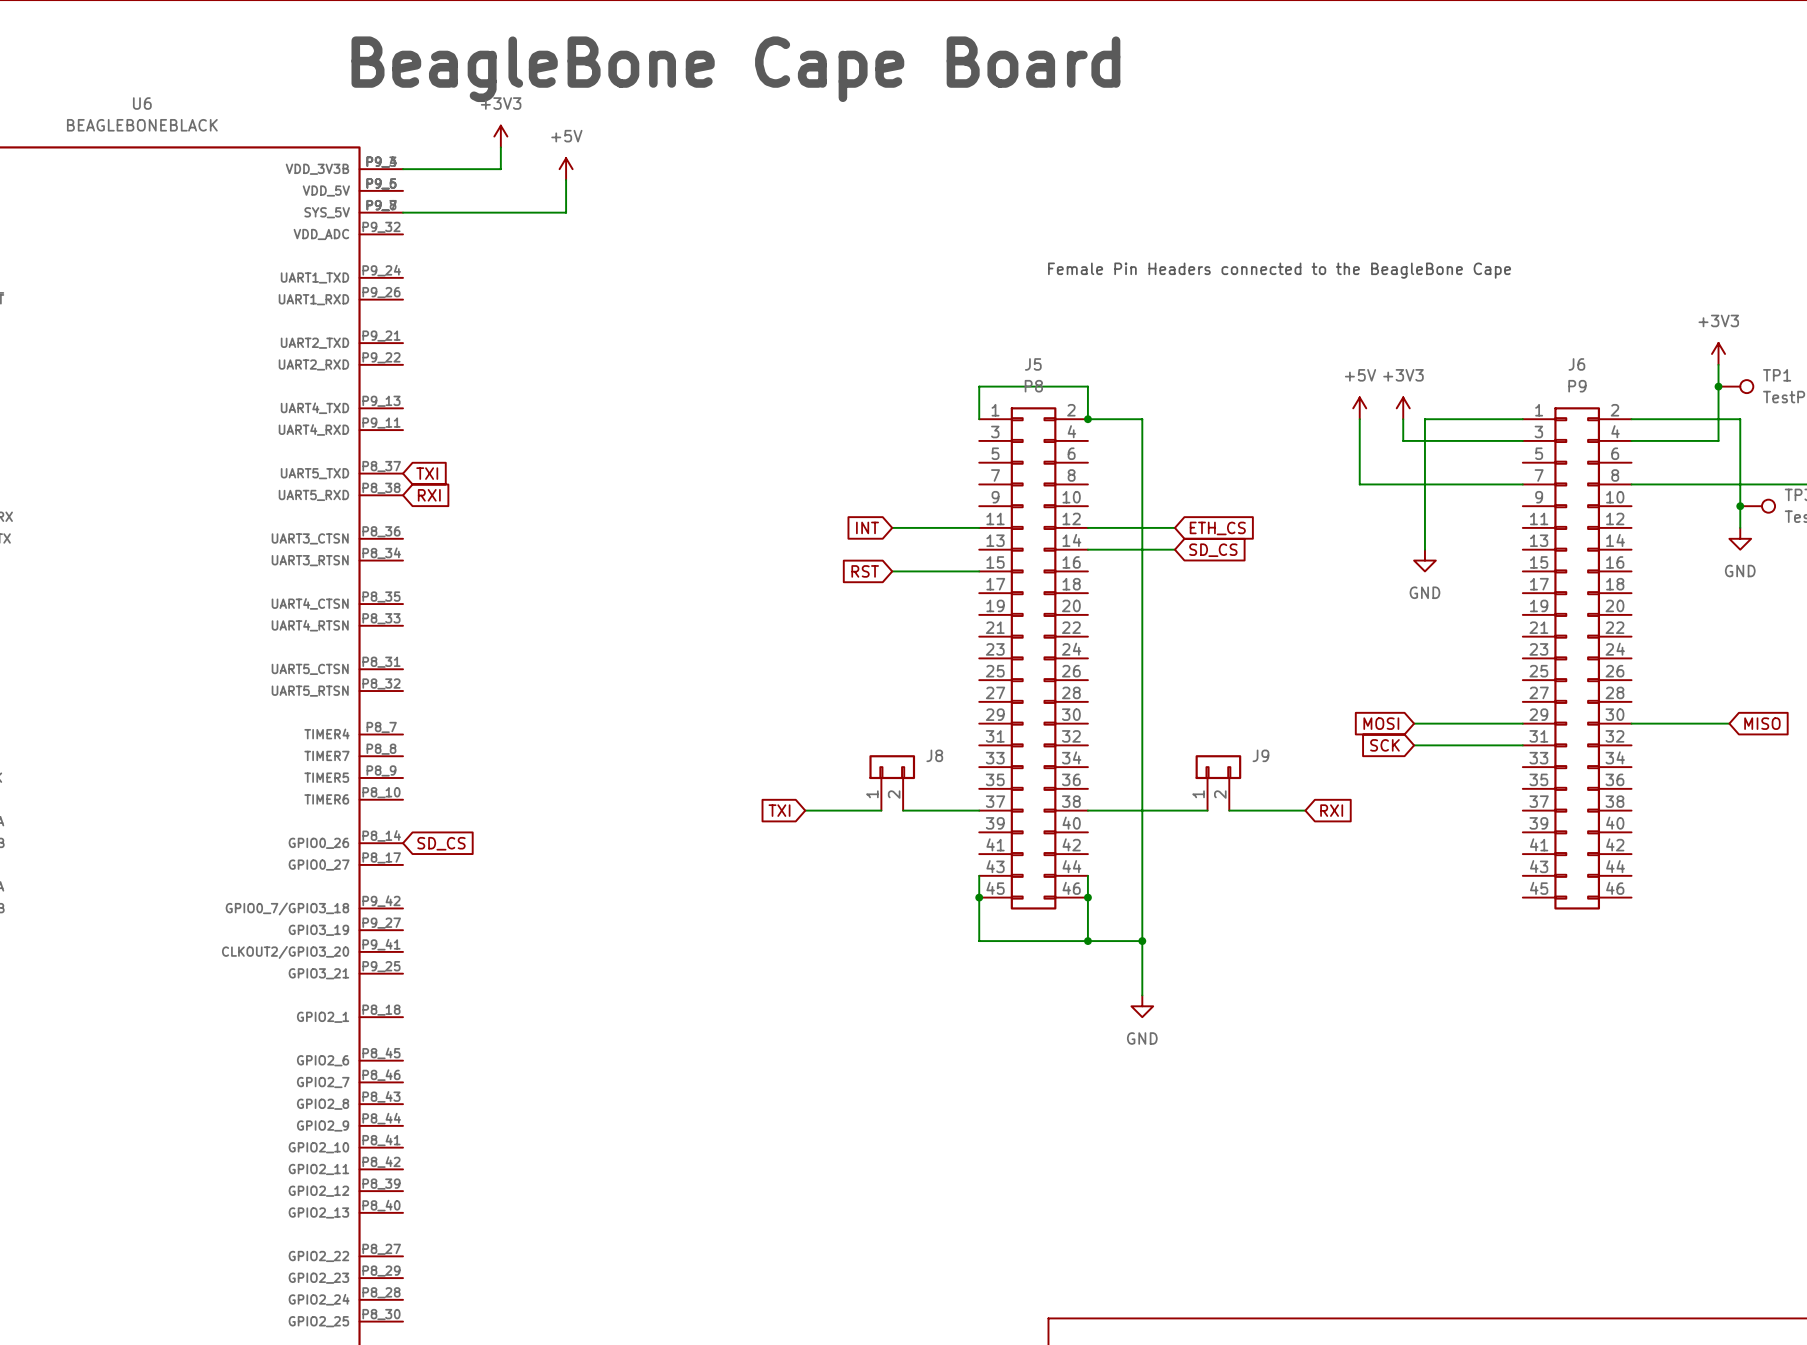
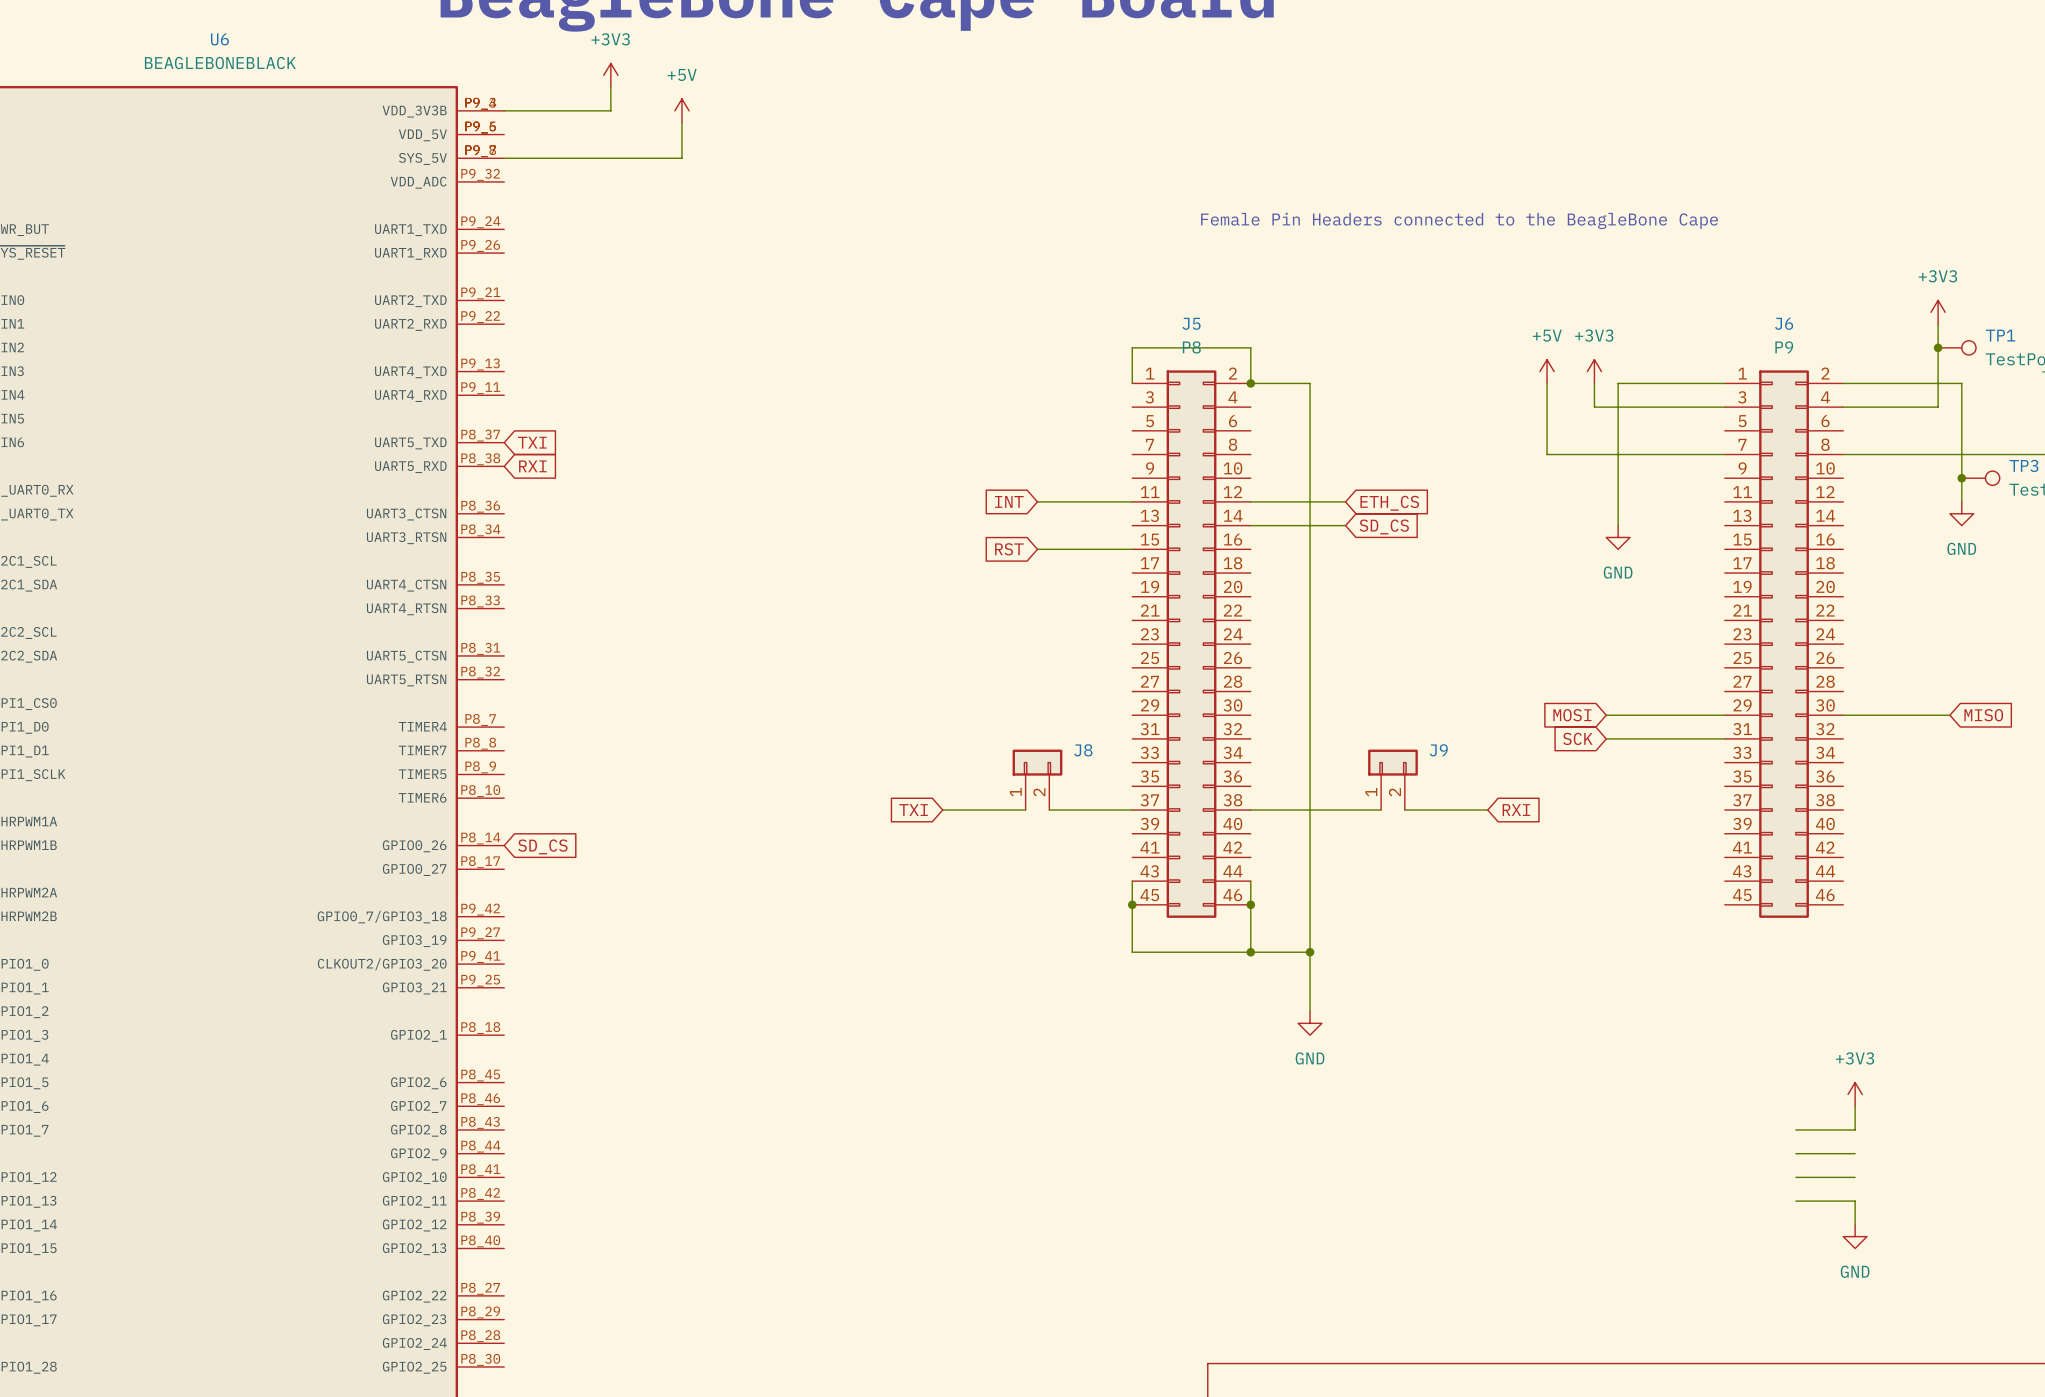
power symbol: none -> +3V3 (1855, 1094)
wire: none -> (1855, 1106) (1855, 1129) (1795, 1129)
wire: none -> (1795, 1153) (1855, 1153)
wire: none -> (1795, 1177) (1855, 1177)
wire: none -> (1795, 1201) (1855, 1201) (1855, 1224)
power symbol: none -> GND (1855, 1236)

